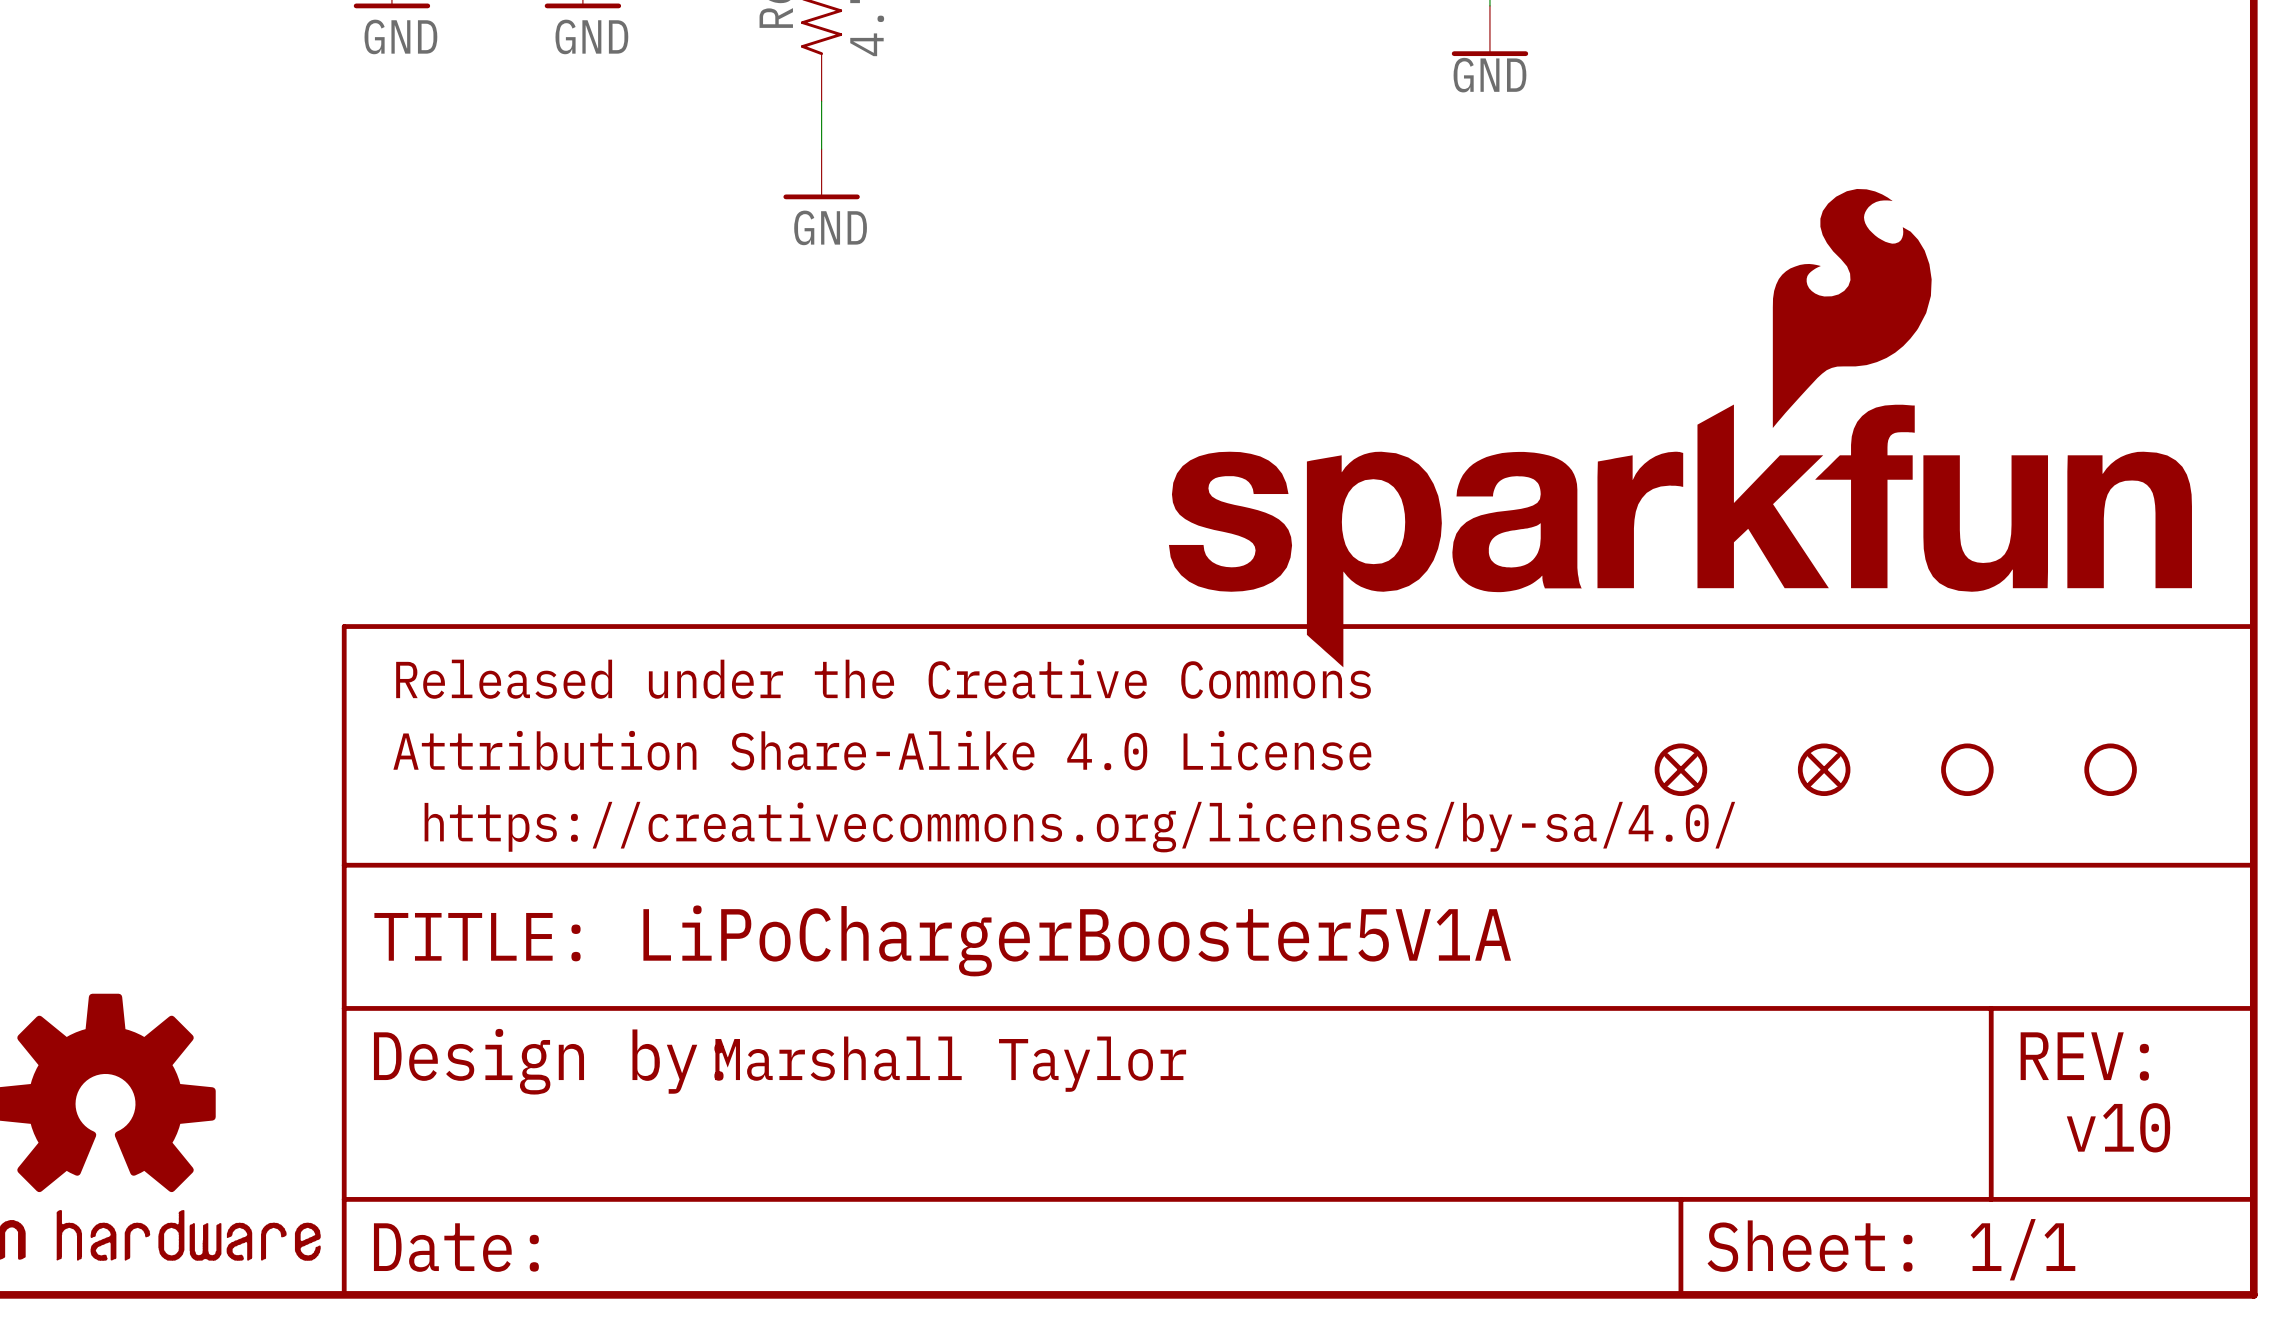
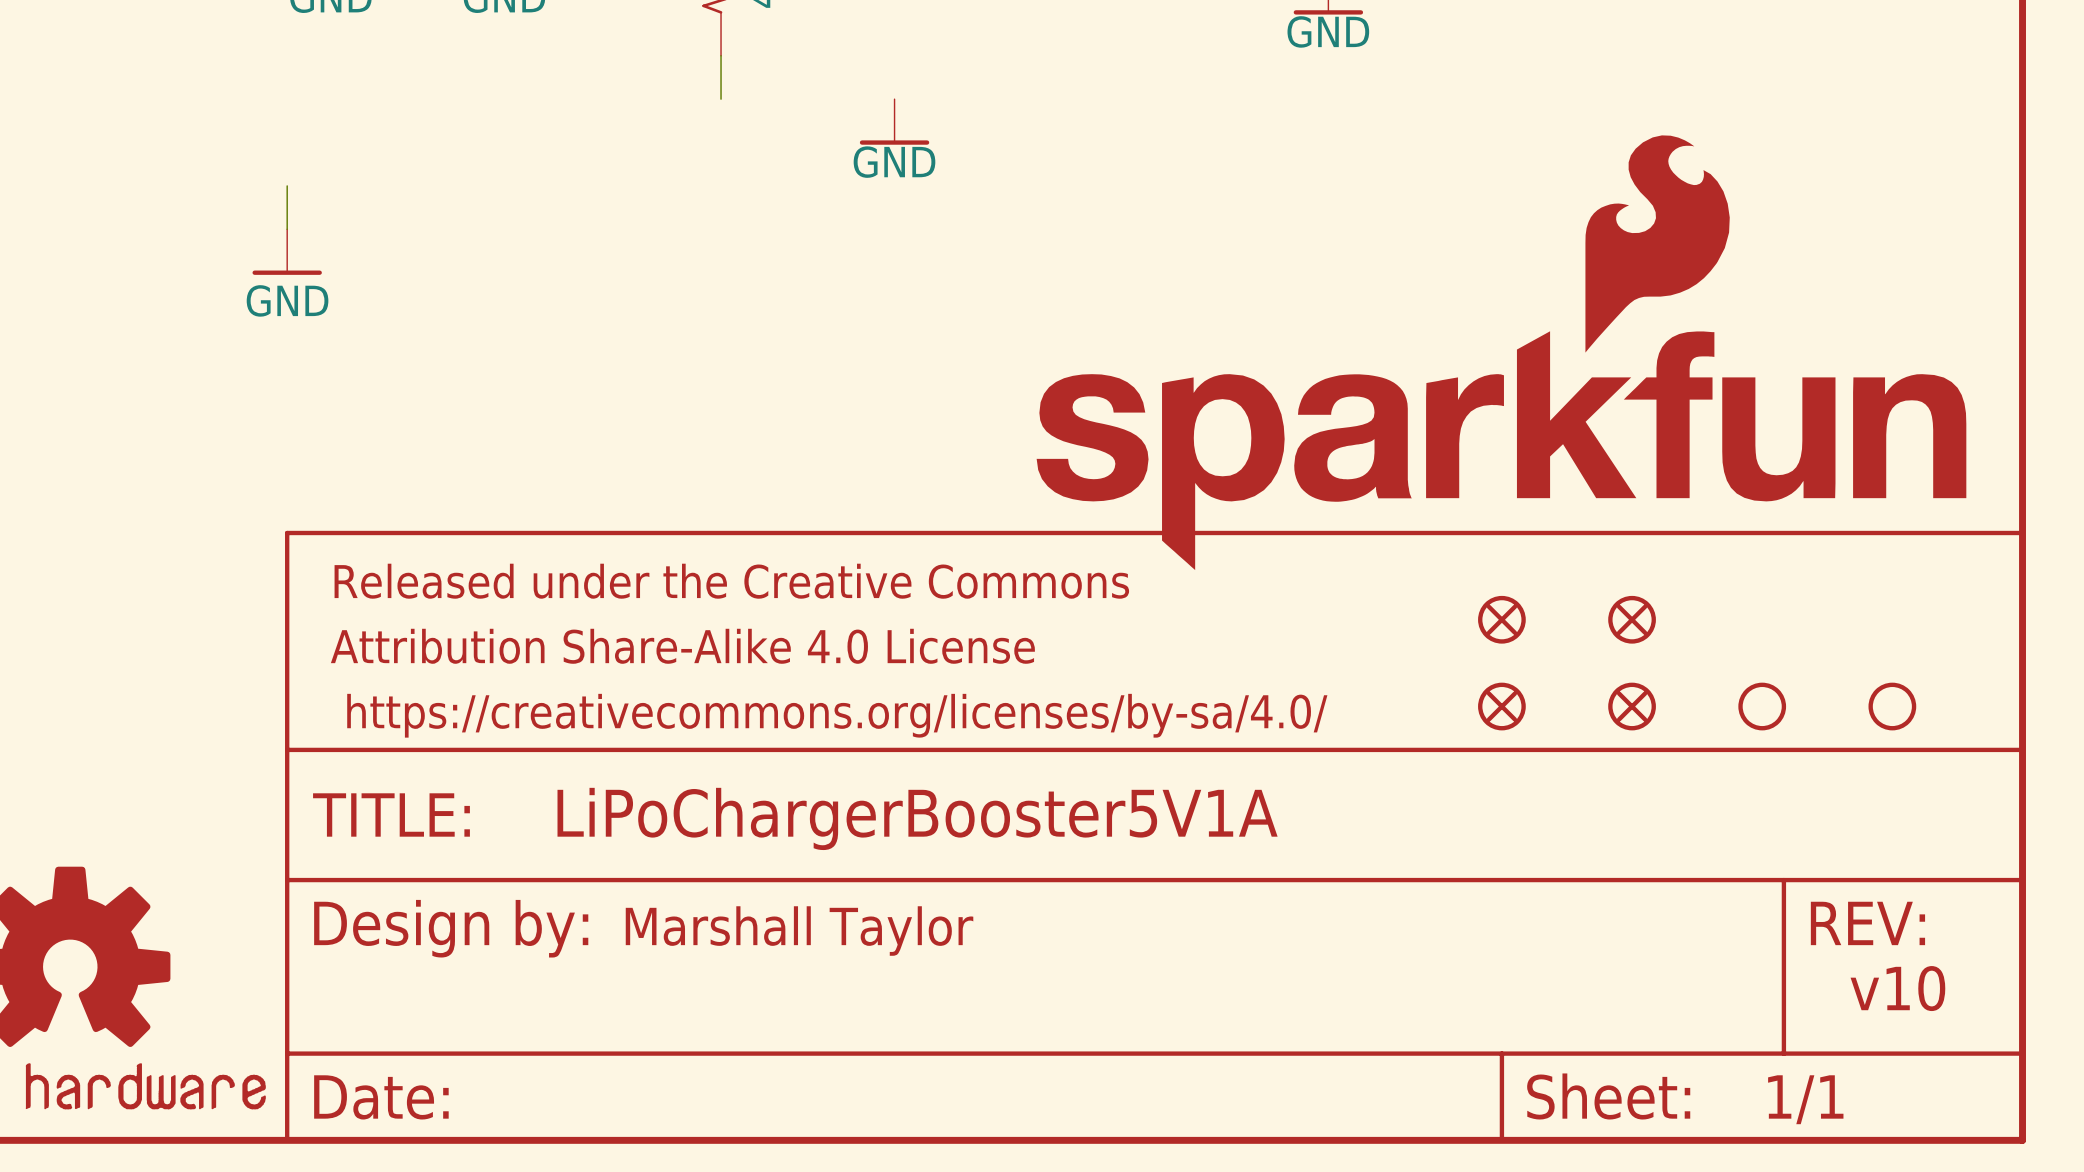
power symbol position: GND (821, 174) -> GND (894, 121)
power symbol text position: GND (830, 227) -> GND (894, 162)
wire: none -> (287, 185) (287, 229)
power symbol: none -> GND (287, 252)
part: none -> (1501, 619)
part: none -> (1632, 619)
part: (1680, 769) -> none
part: (1824, 769) -> none
part position: (1967, 769) -> (1762, 706)
part position: (2110, 769) -> (1892, 706)
part: none -> (1501, 706)
part: none -> (1632, 706)

